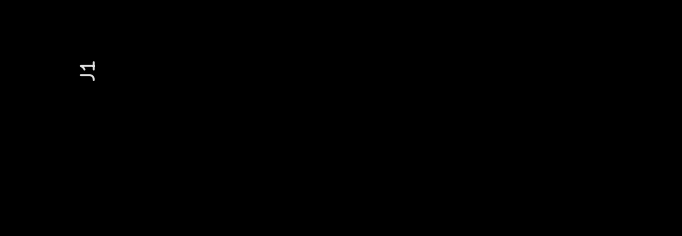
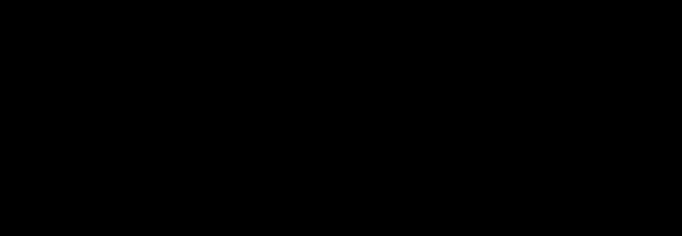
J1 name: J1 (87, 71) -> none

